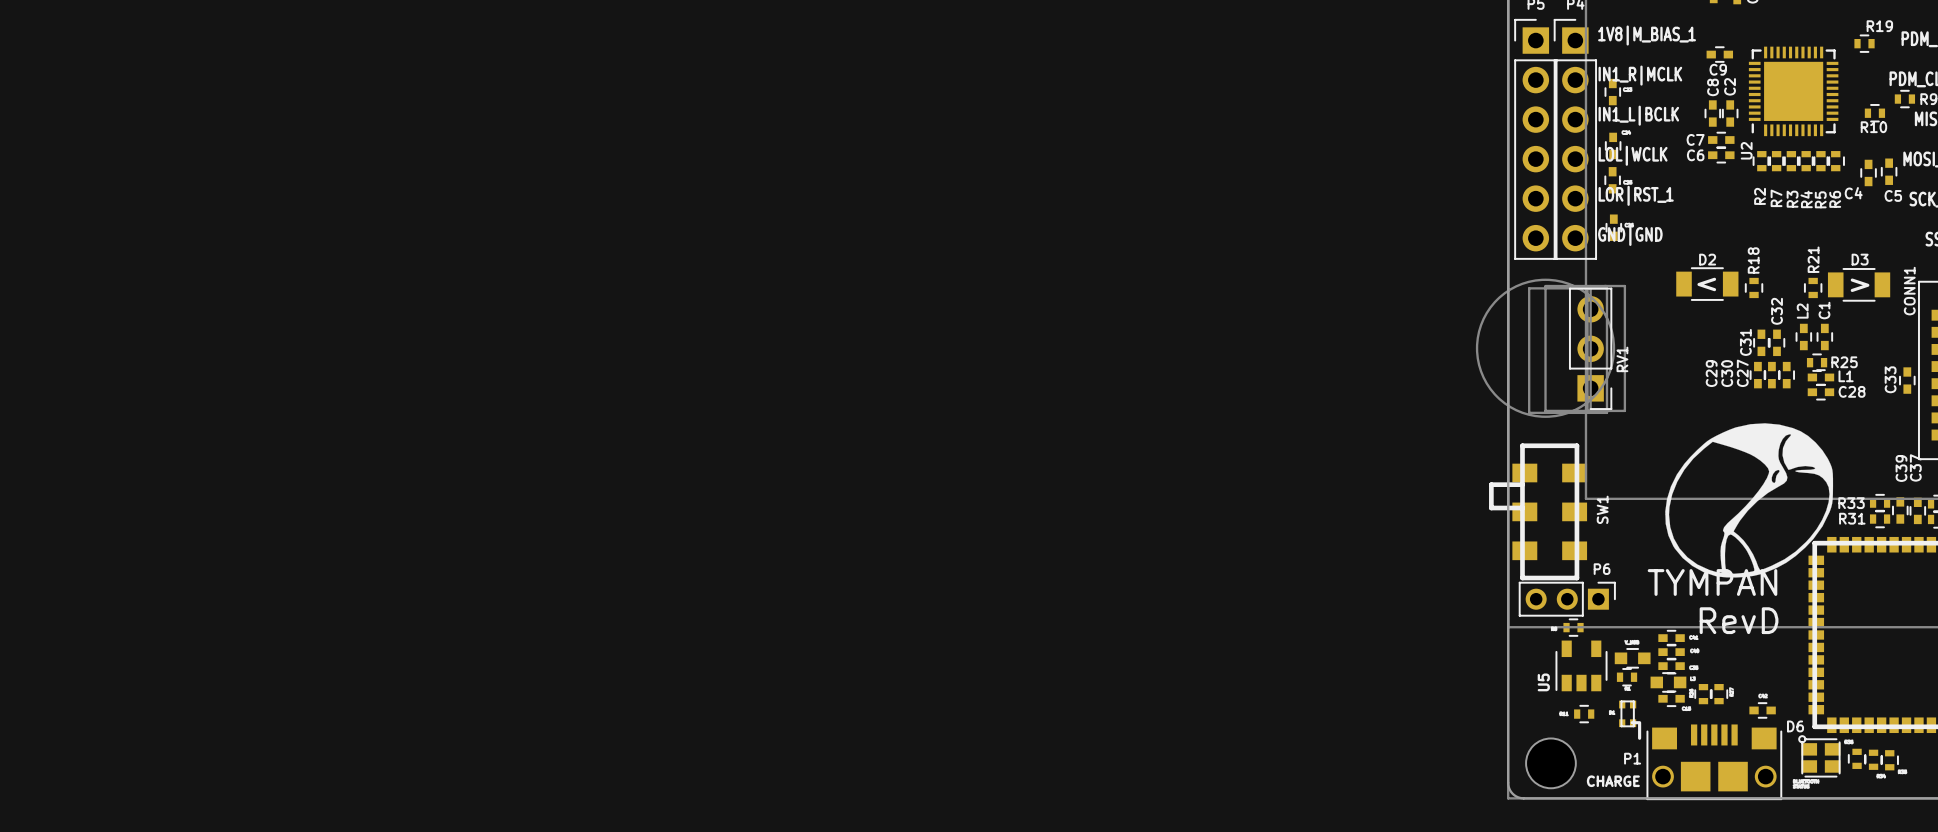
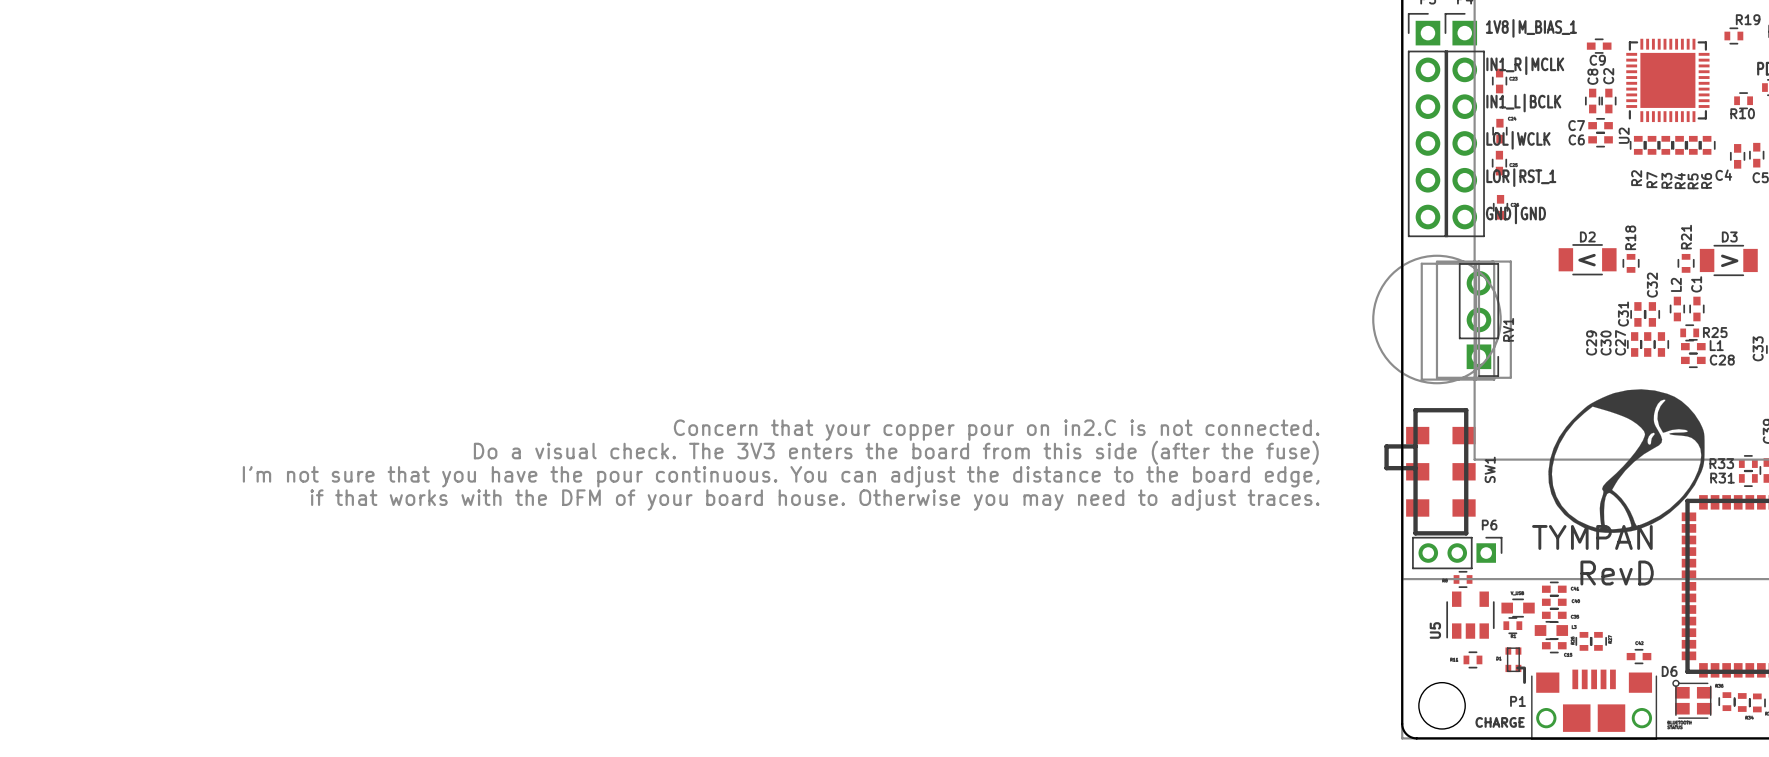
text: none -> Concern that your copper pour on in2.C is not connected. (996, 430)
text: none -> Do a visual check. The 3V3 enters the board from this side (after the fuse) (896, 452)
text: none -> I’m not sure that you have the pour continuous. You can adjust the distance to the board edge, (781, 476)
text: none -> if that works with the DFM of your board house. Otherwise you may need to adjust traces. (814, 500)

